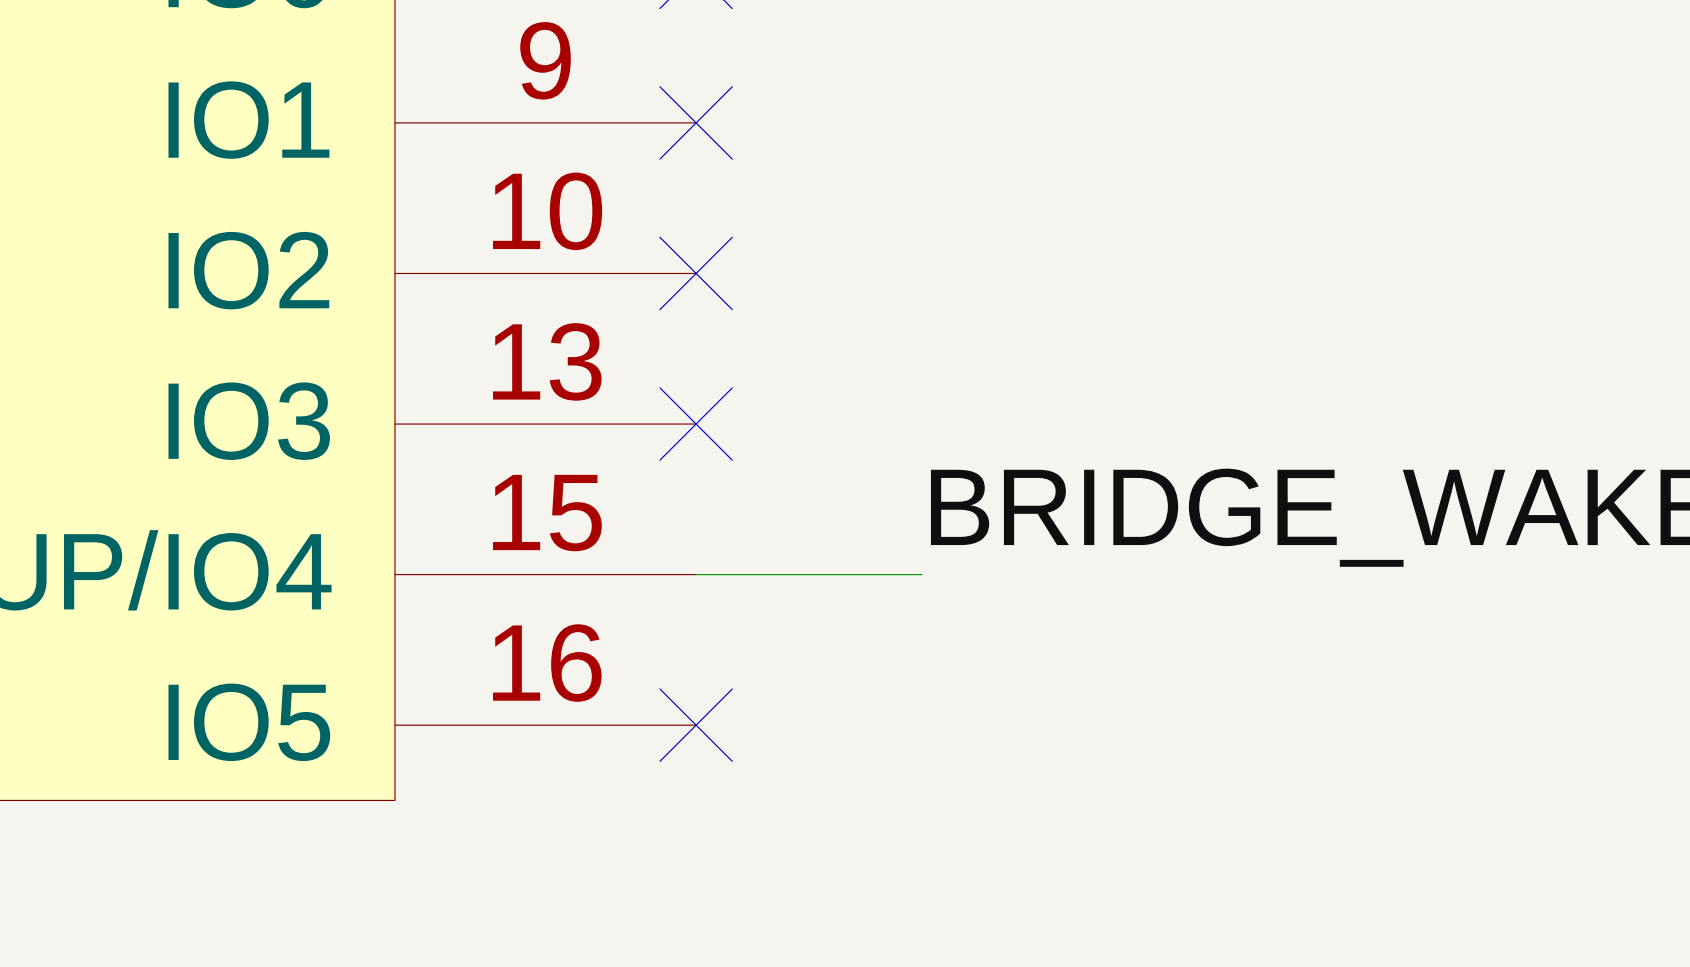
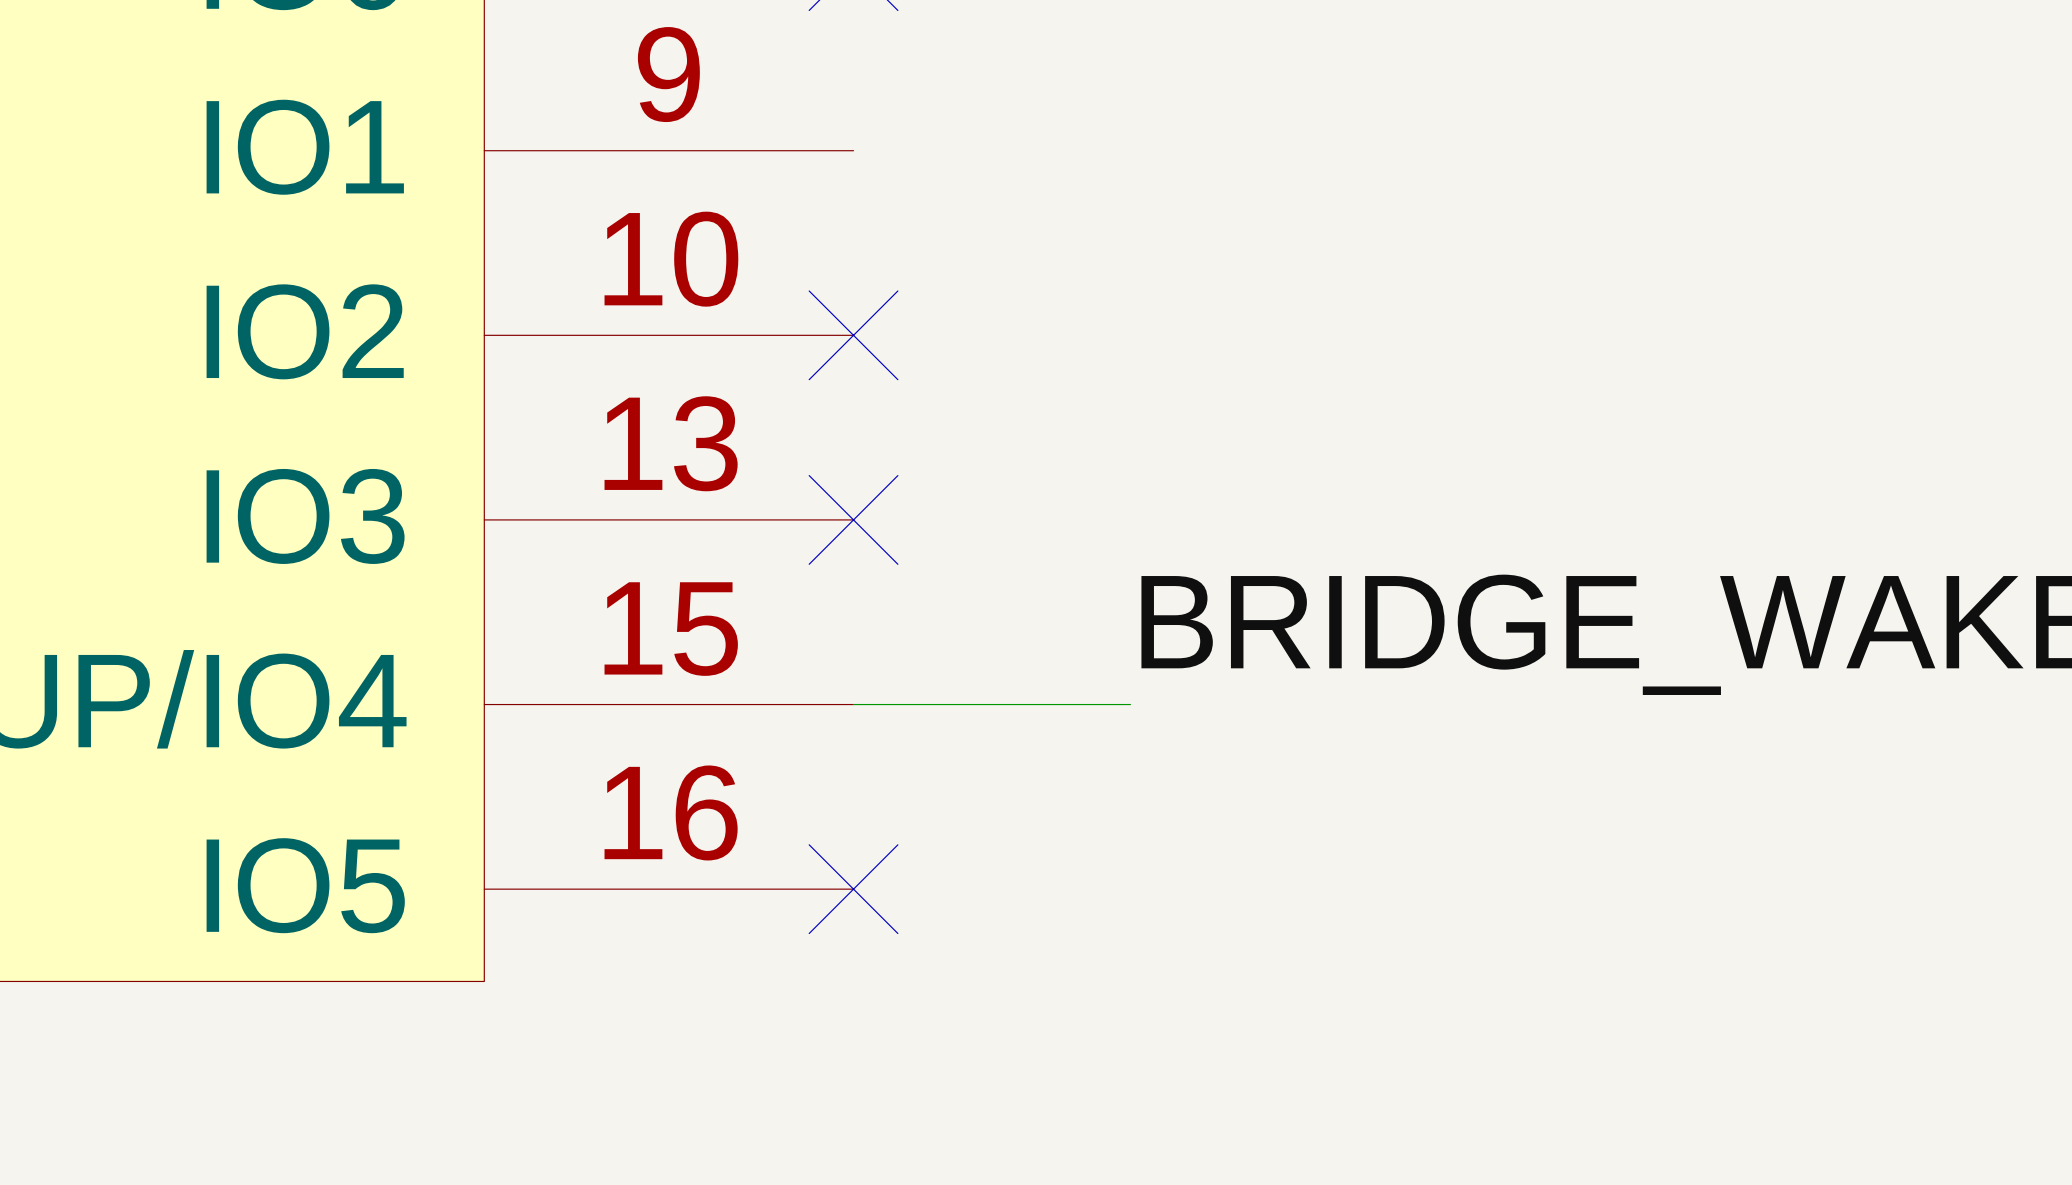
no-connect mark: (696, 122) -> none

